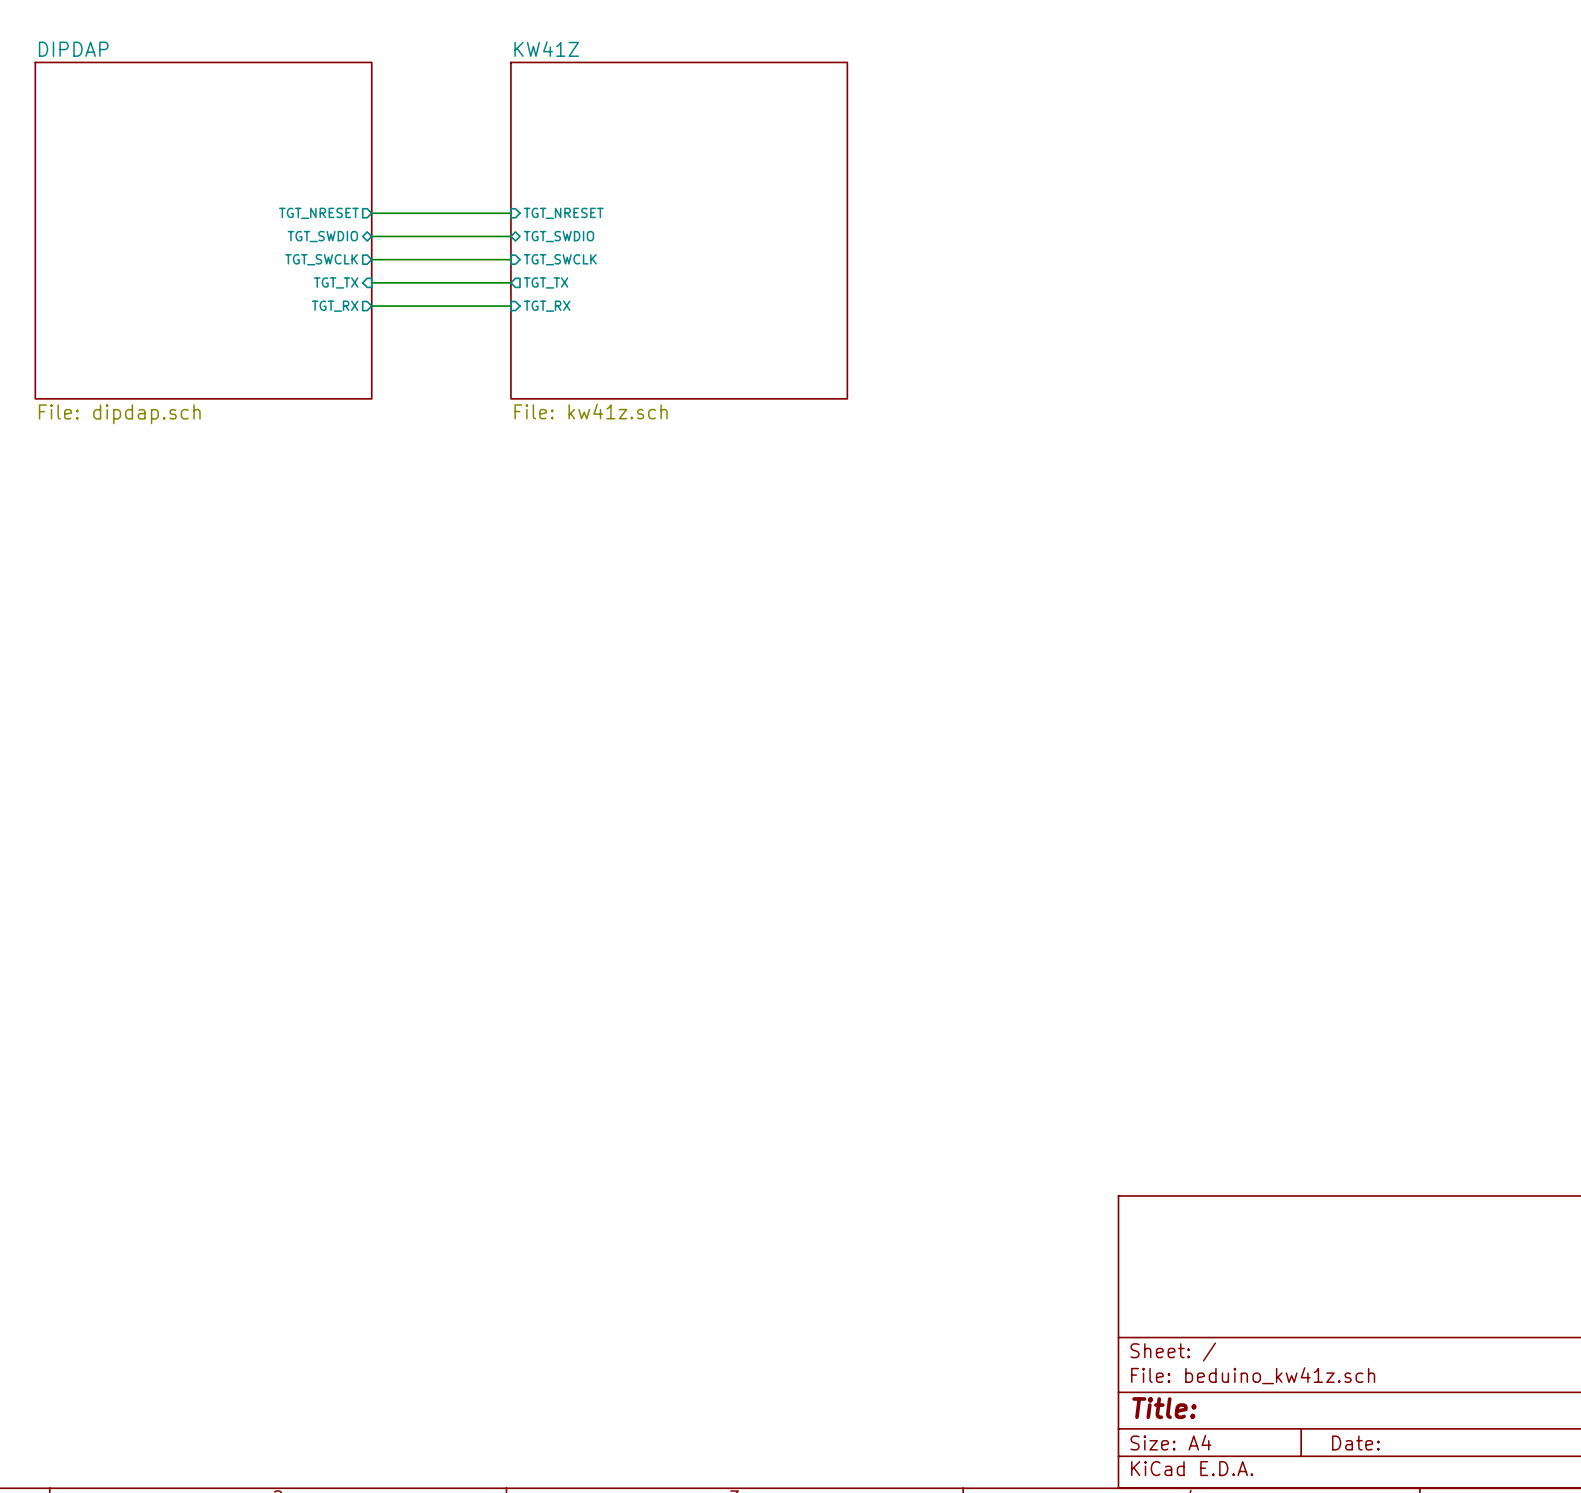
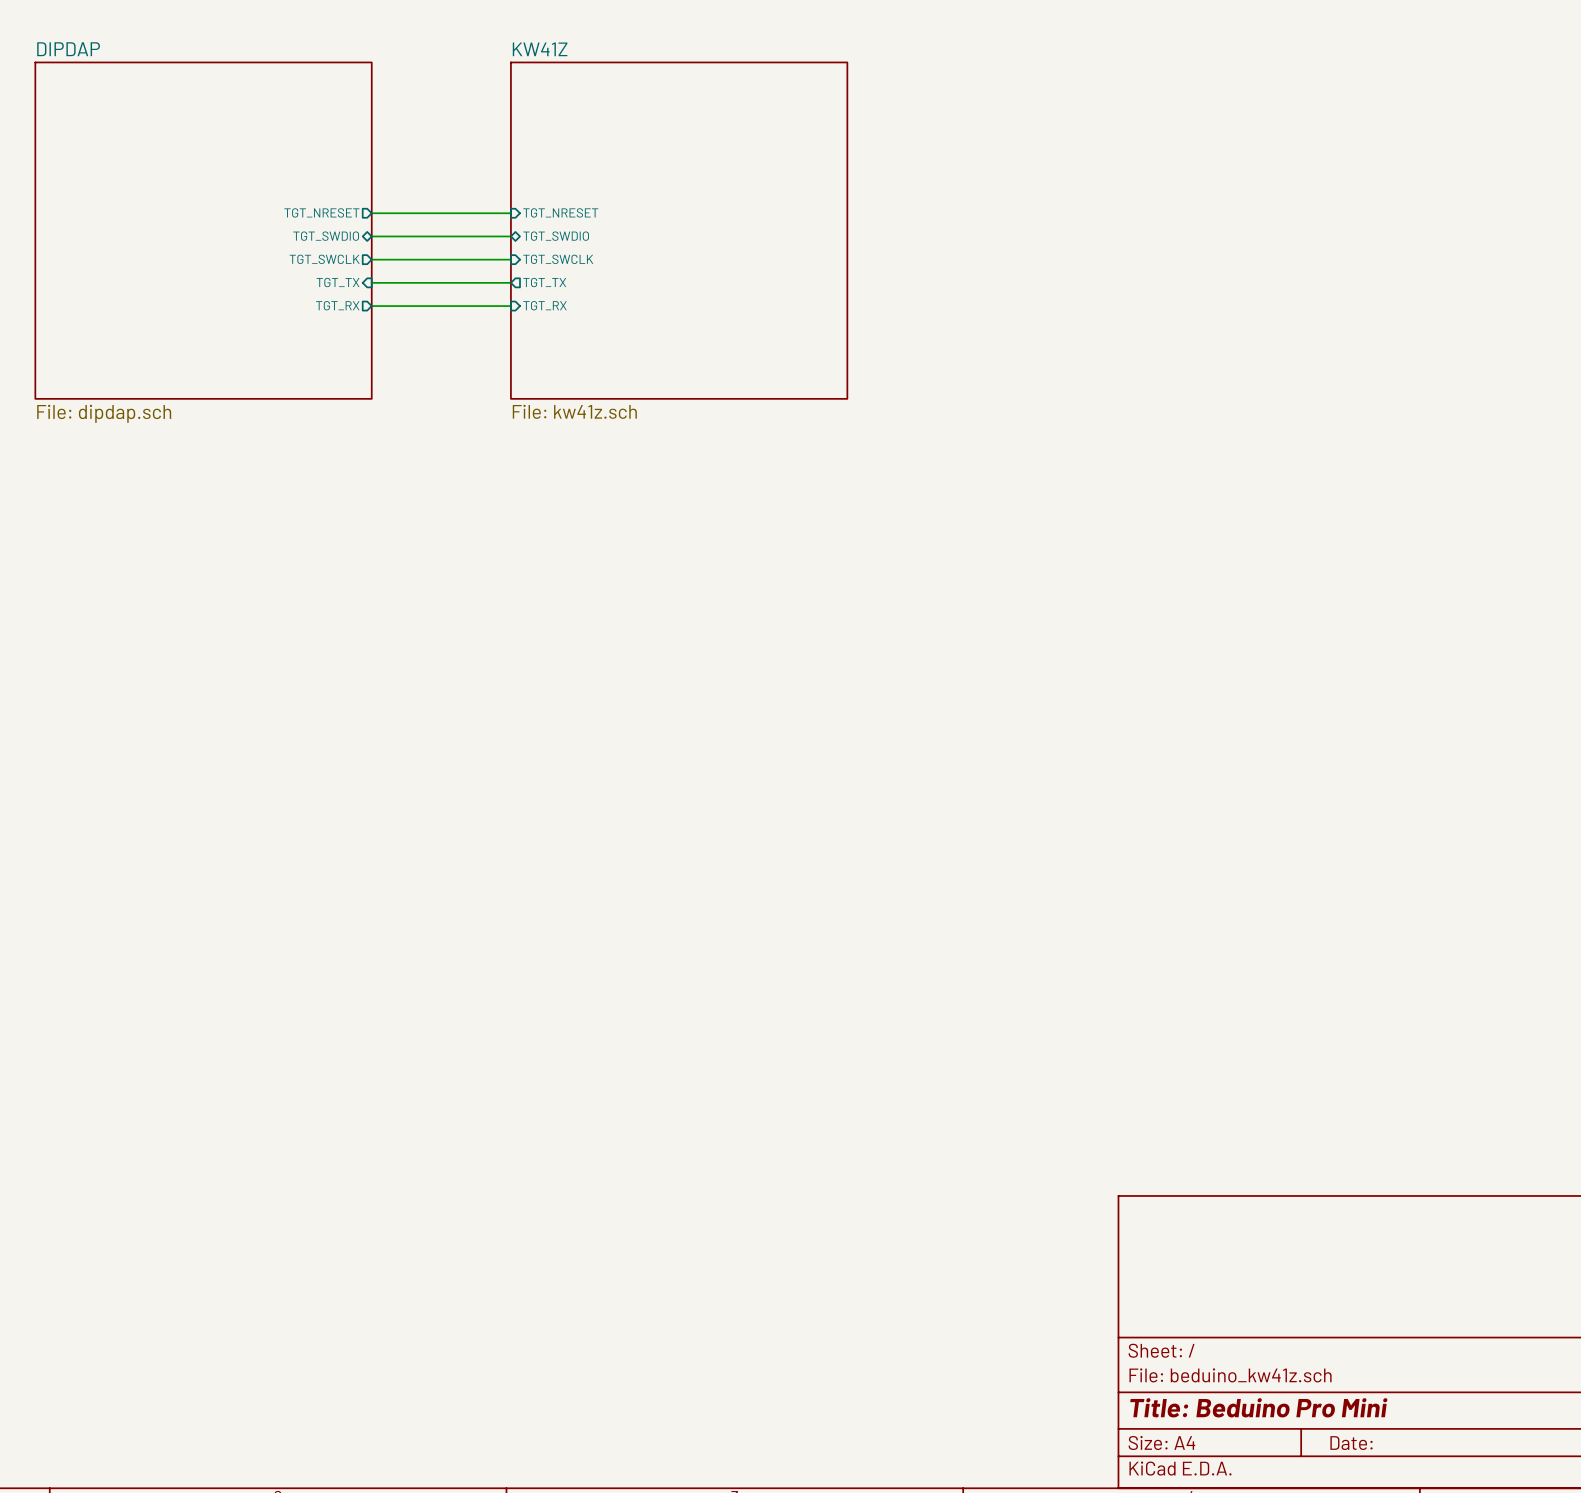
title block: Title: (1164, 1408) -> Title: Beduino Pro Mini (1258, 1407)

